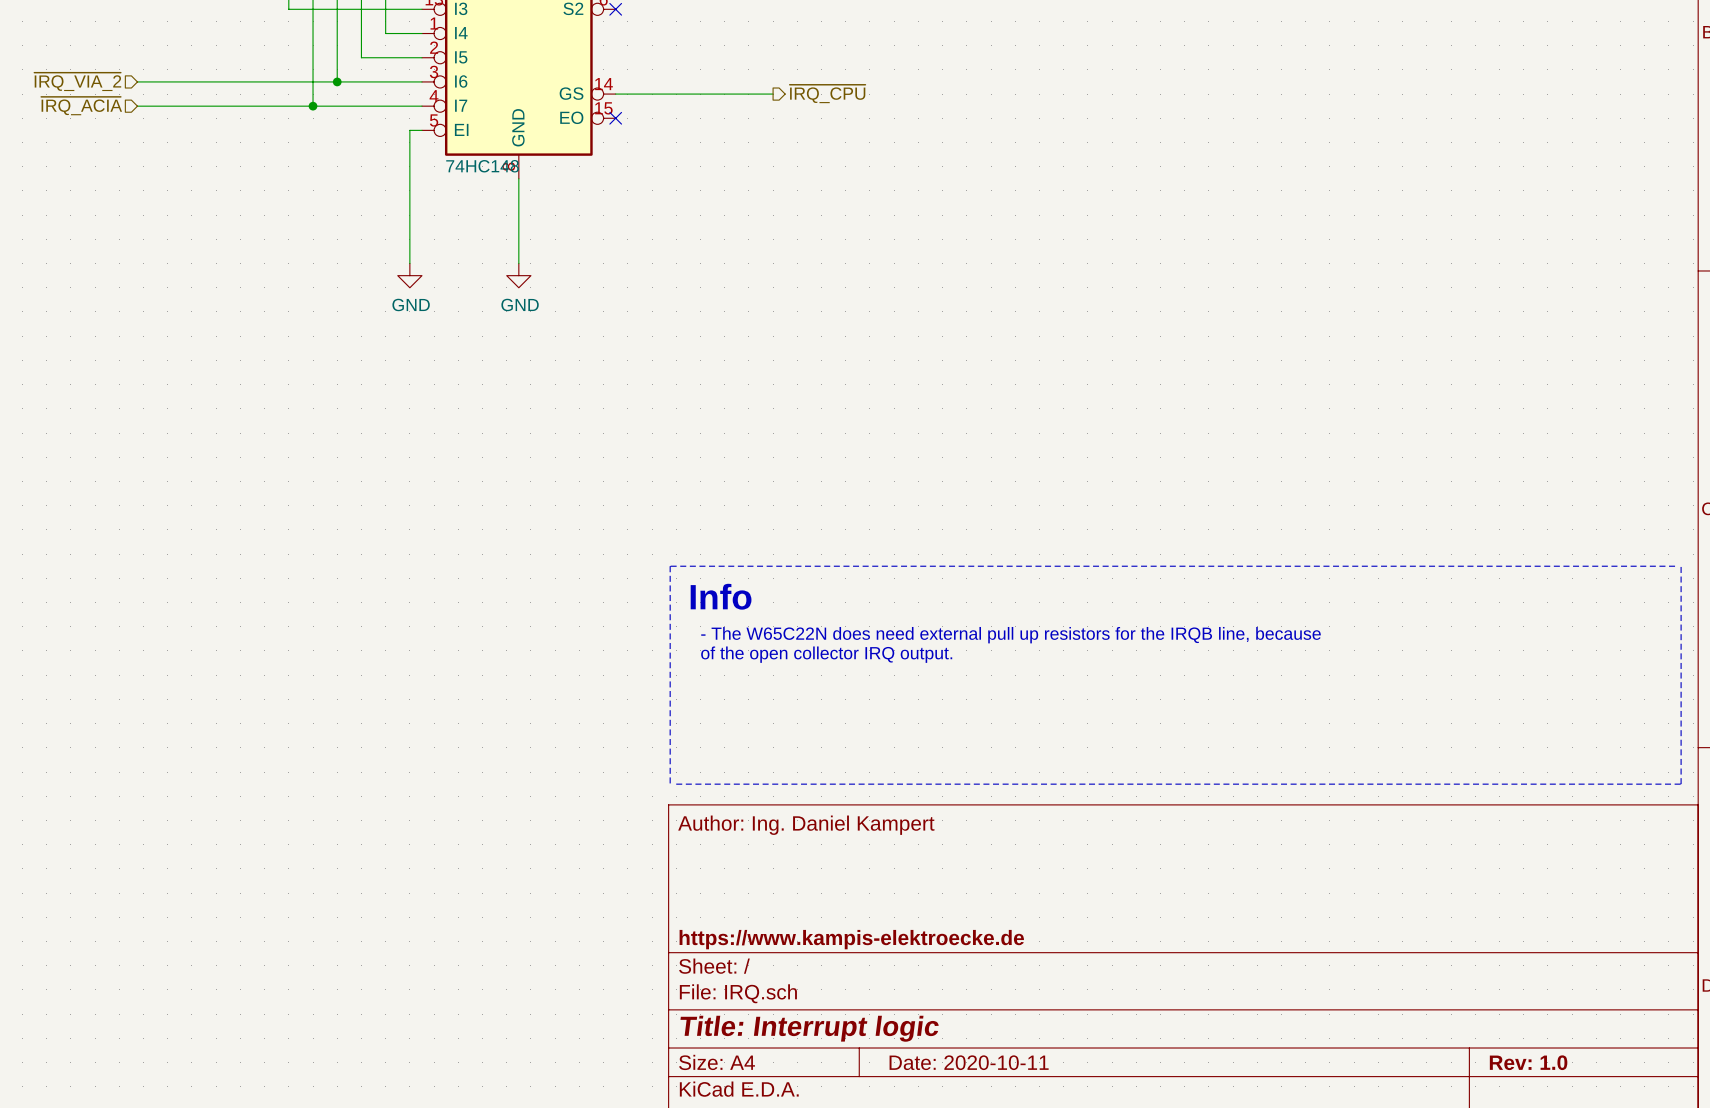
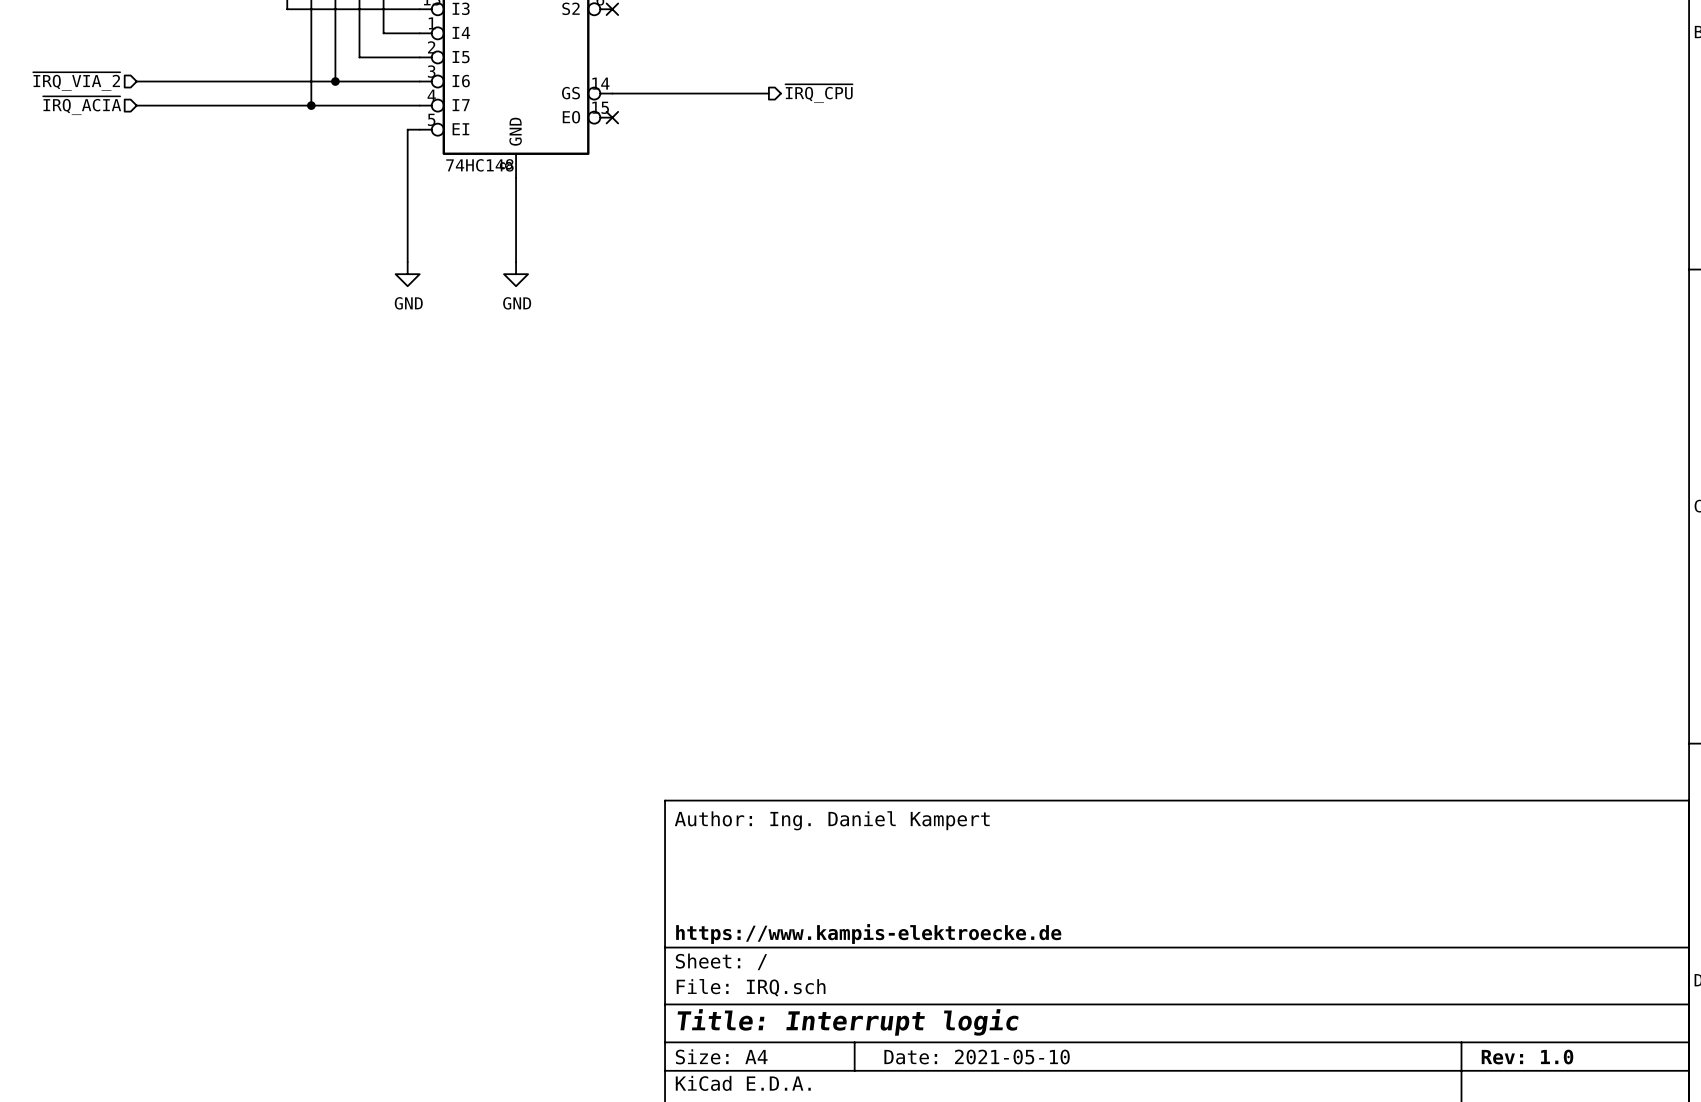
line: (1675, 566) (670, 566) (670, 784) -> none
line: (1681, 566) (1681, 784) (676, 784) -> none
text: Info (721, 596) -> none
text: - The W65C22N does need external pull up resistors for the IRQB line, because (1011, 635) -> none
text: of the open collector IRQ output. (826, 654) -> none
title block: Date: 2020-10-11 (969, 1062) -> Date: 2021-05-10 (977, 1057)

